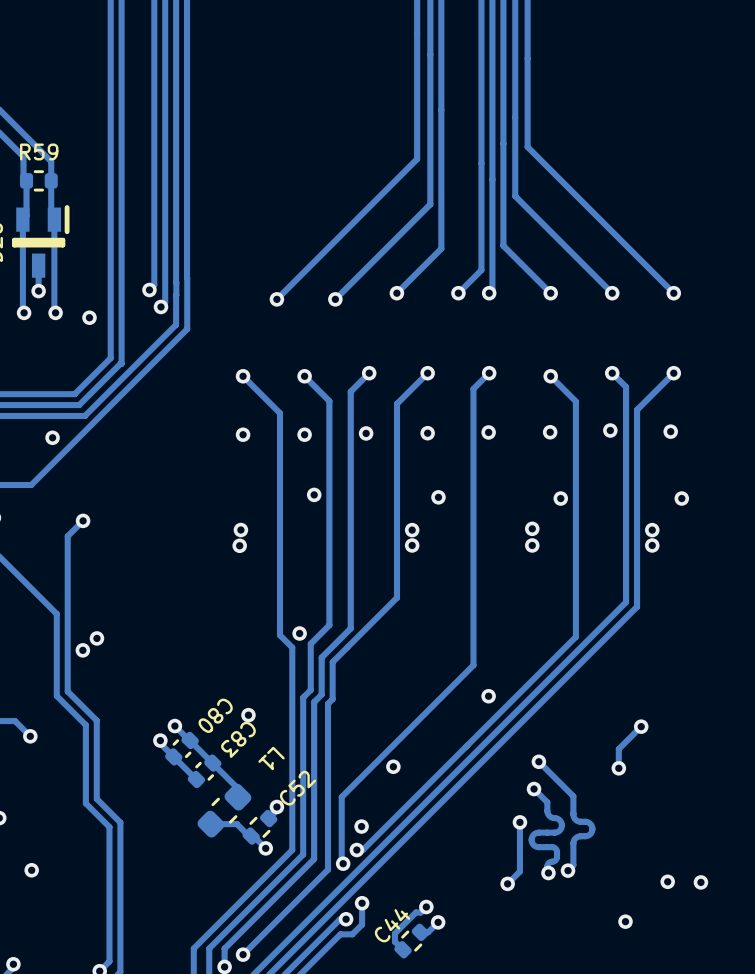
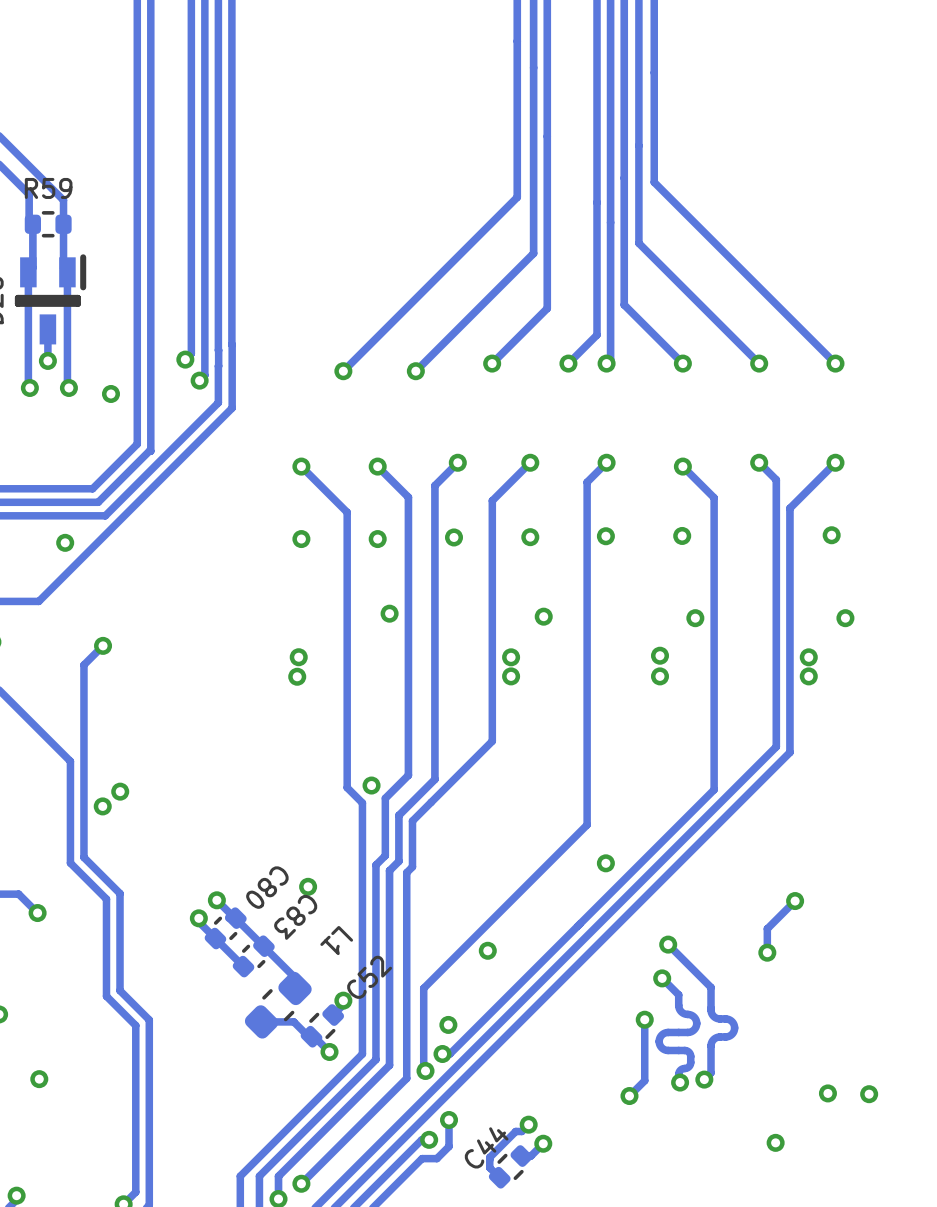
via: (610, 430) -> none

